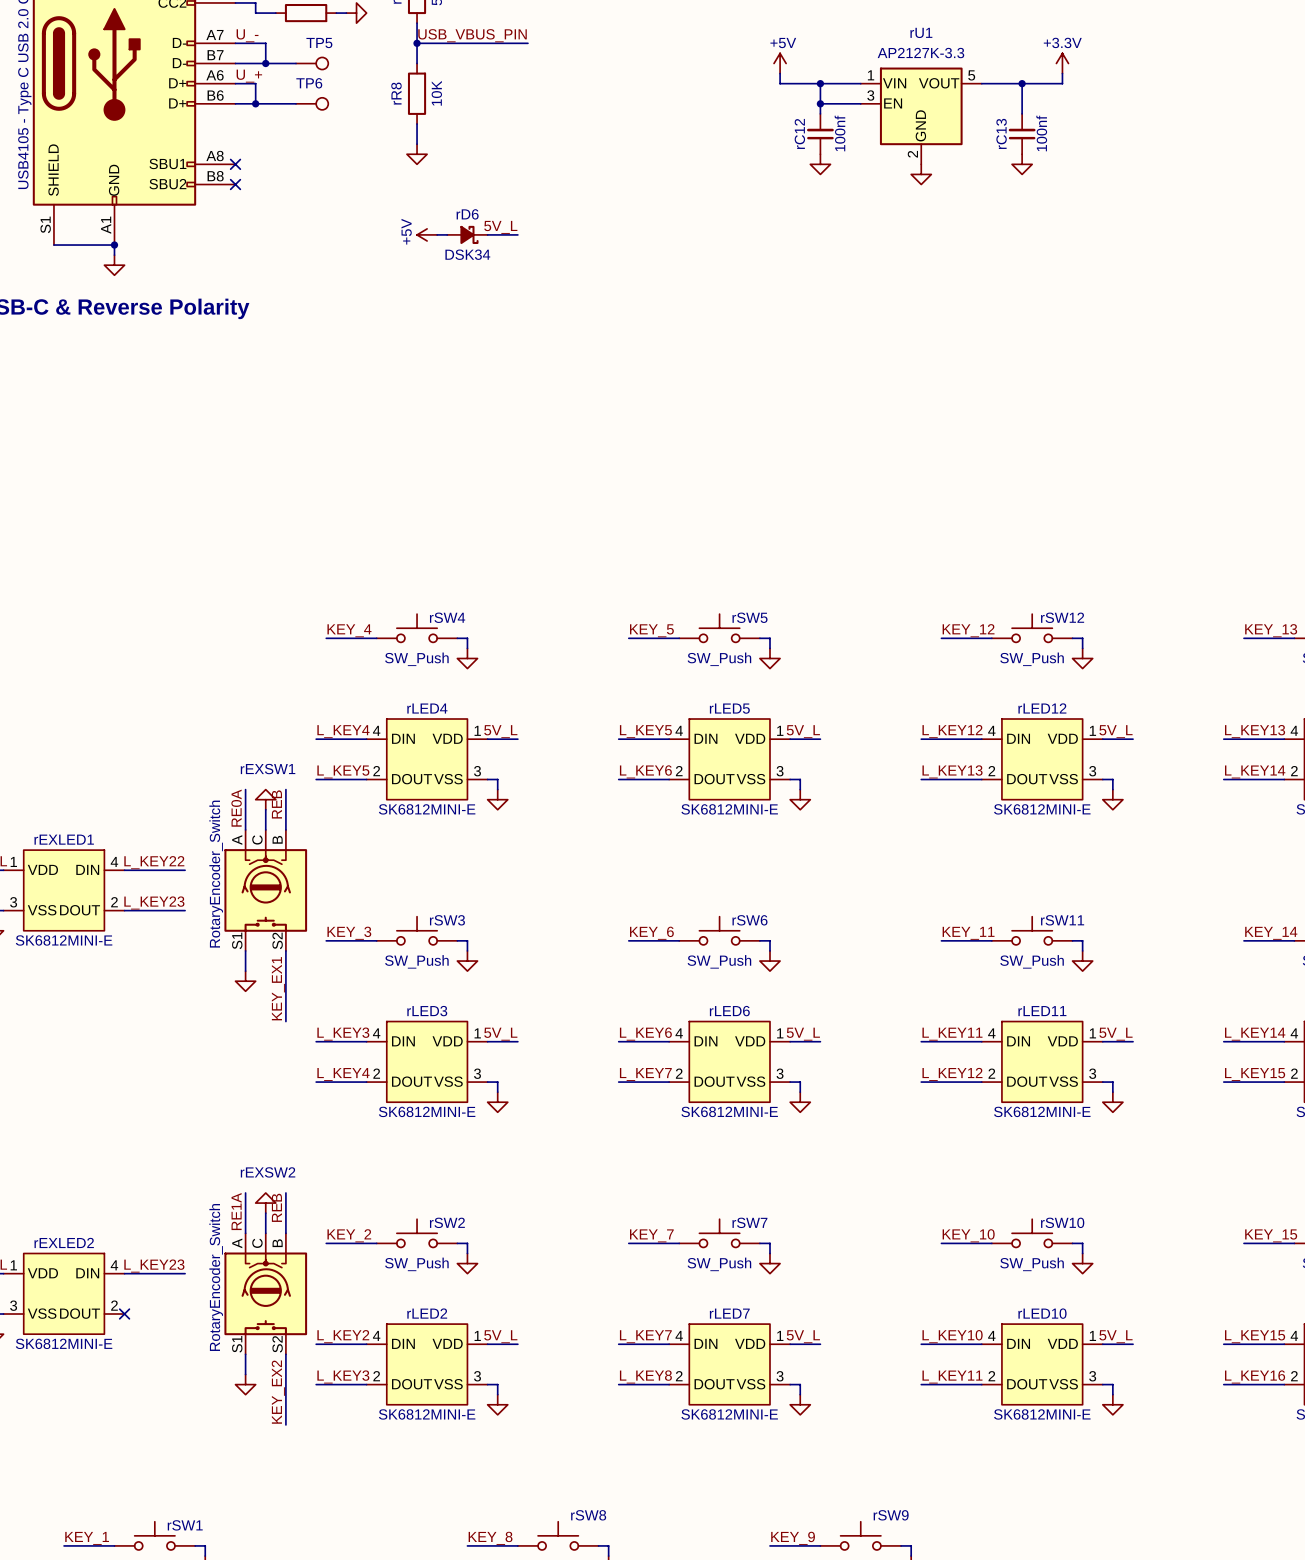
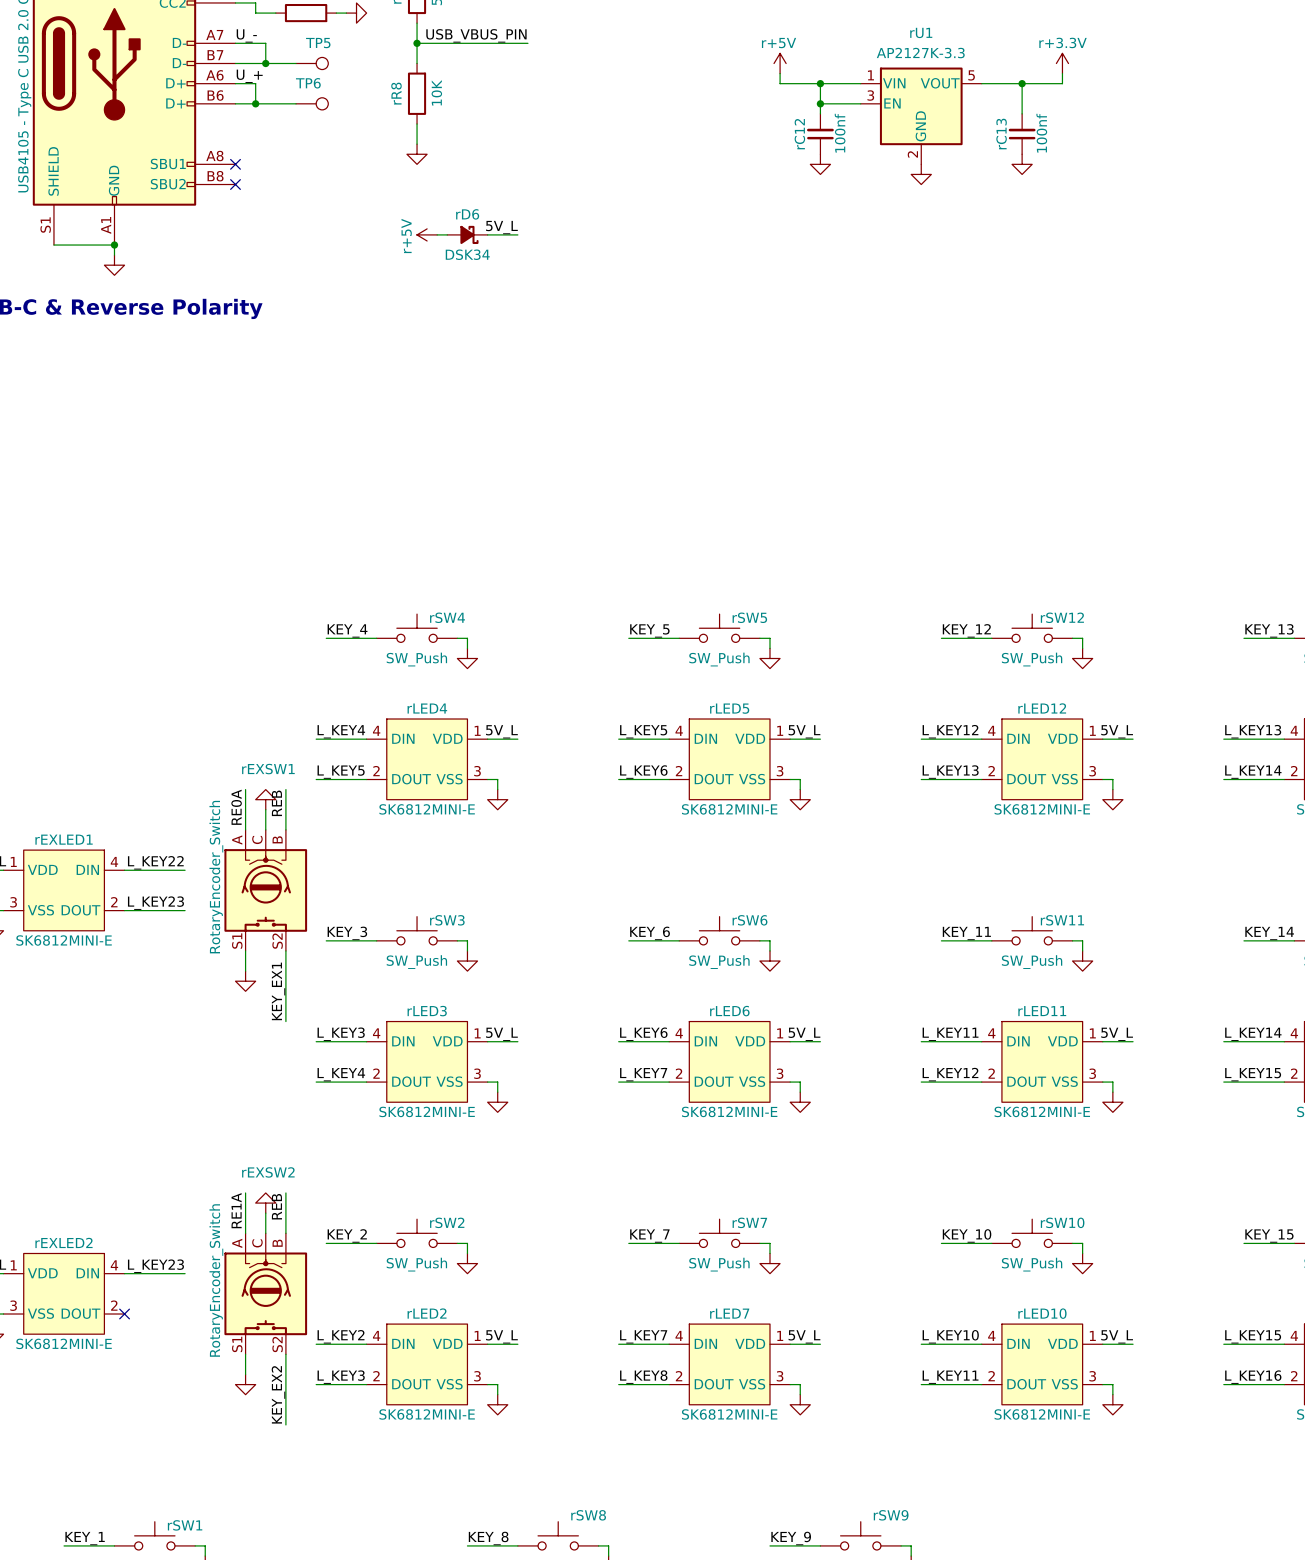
power symbol: +5V (780, 63) -> r+5V (780, 63)
power symbol: +3.3V (1062, 63) -> r+3.3V (1062, 63)
power symbol: +5V (427, 234) -> r+5V (427, 234)

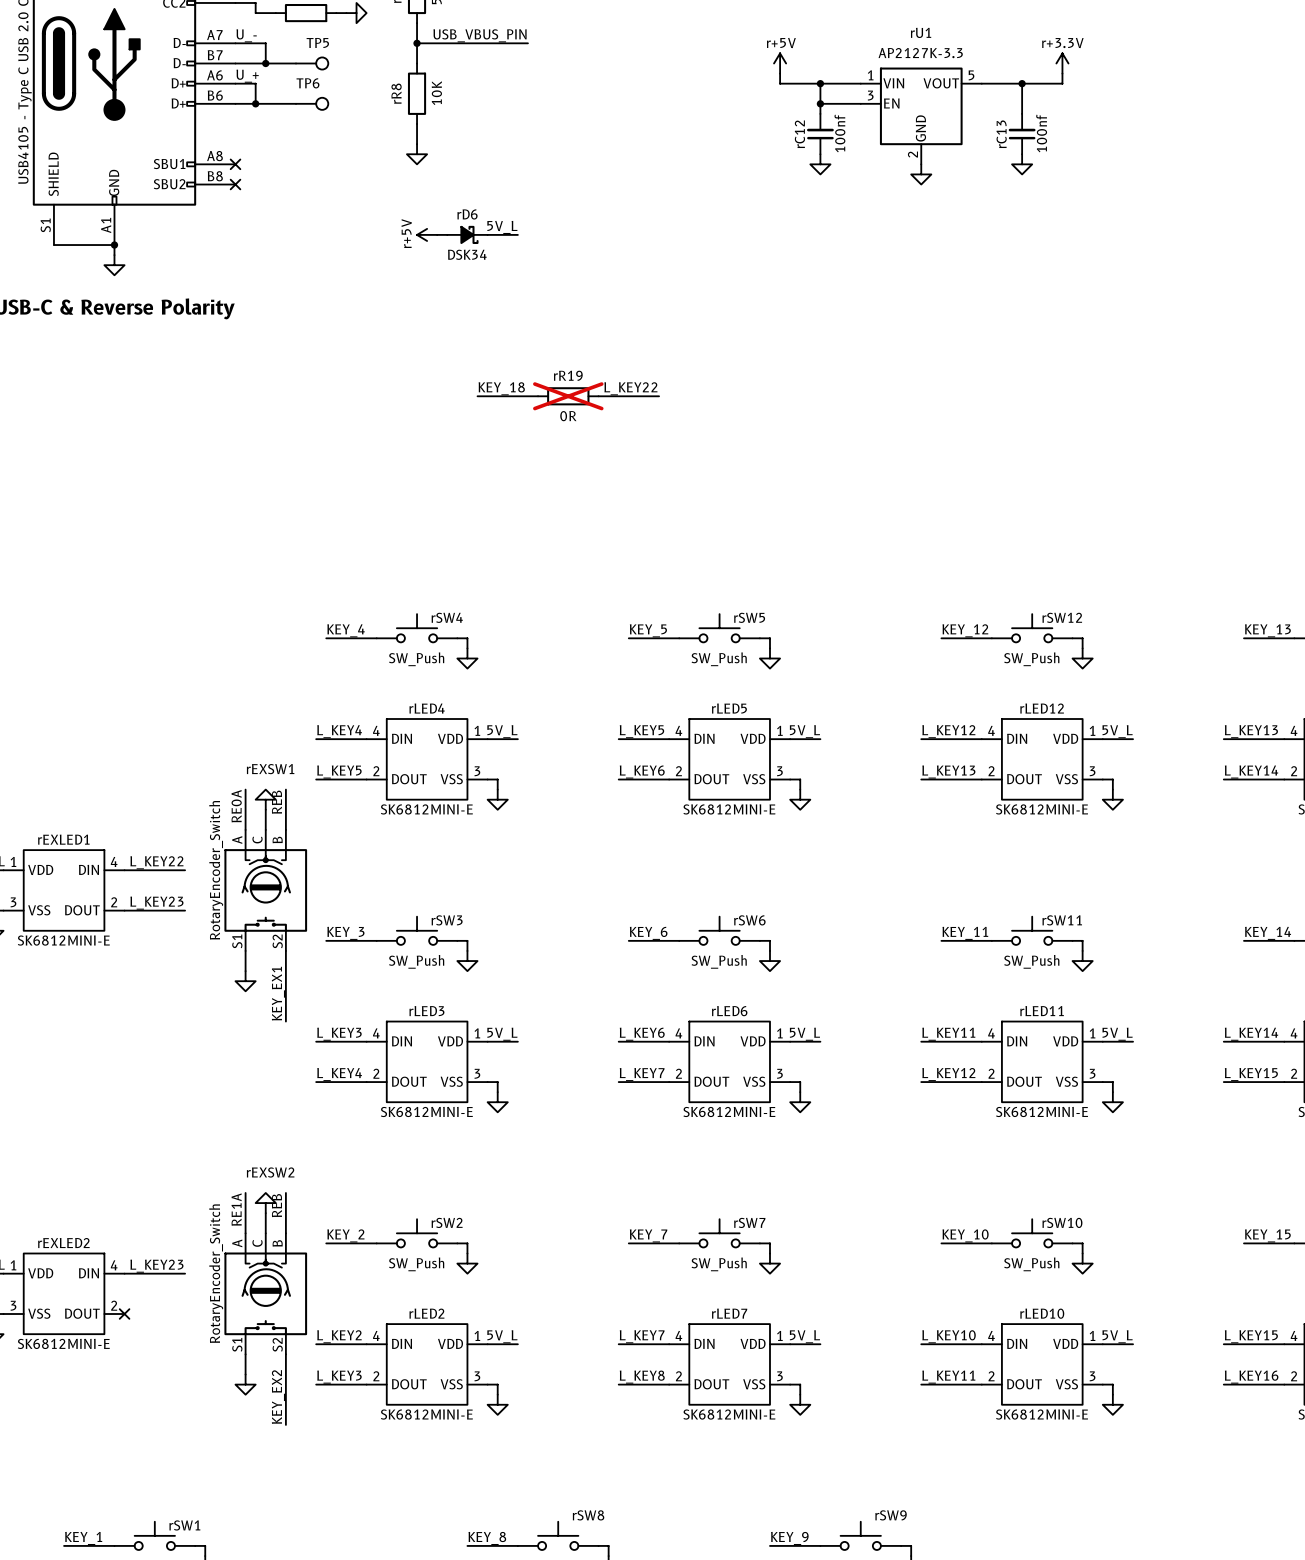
label: none -> KEY_18 (501, 388)
label: none -> L_KEY22 (630, 388)
wire: none -> (477, 396) (538, 396)
rR19: none -> 0R (568, 396)
wire: none -> (598, 396) (659, 396)

